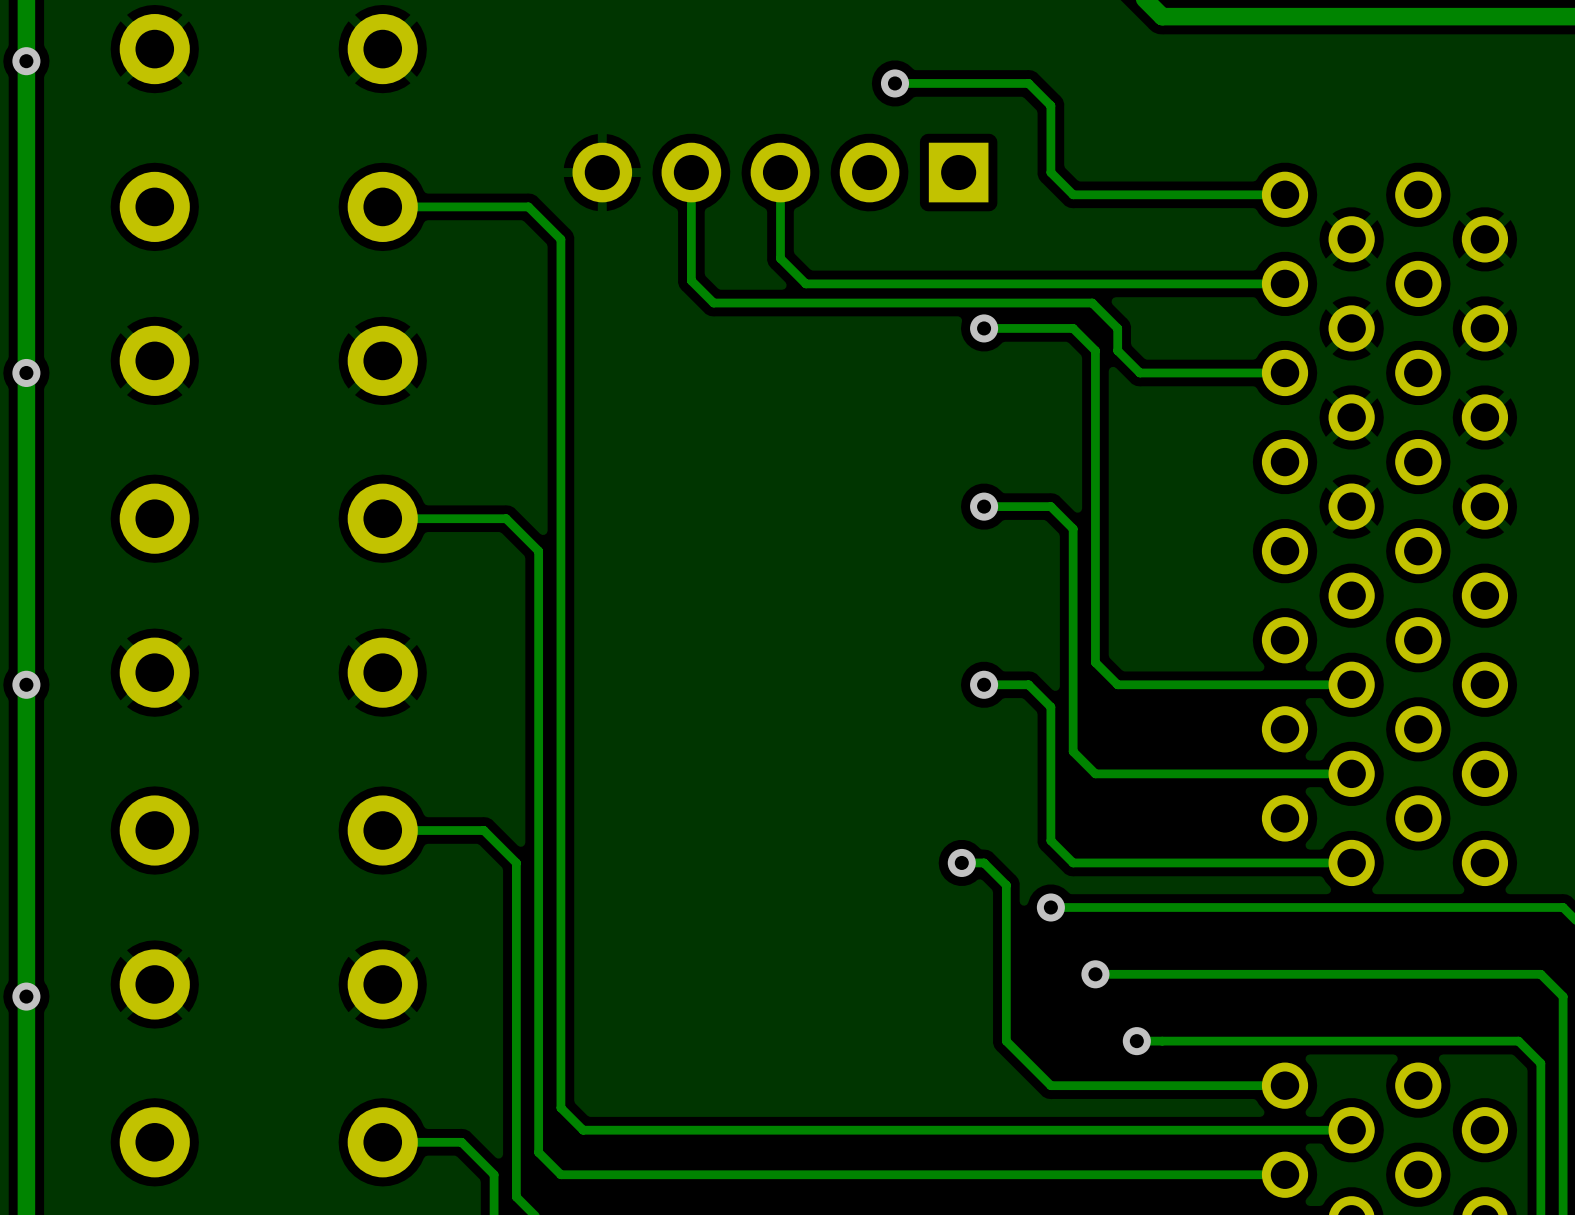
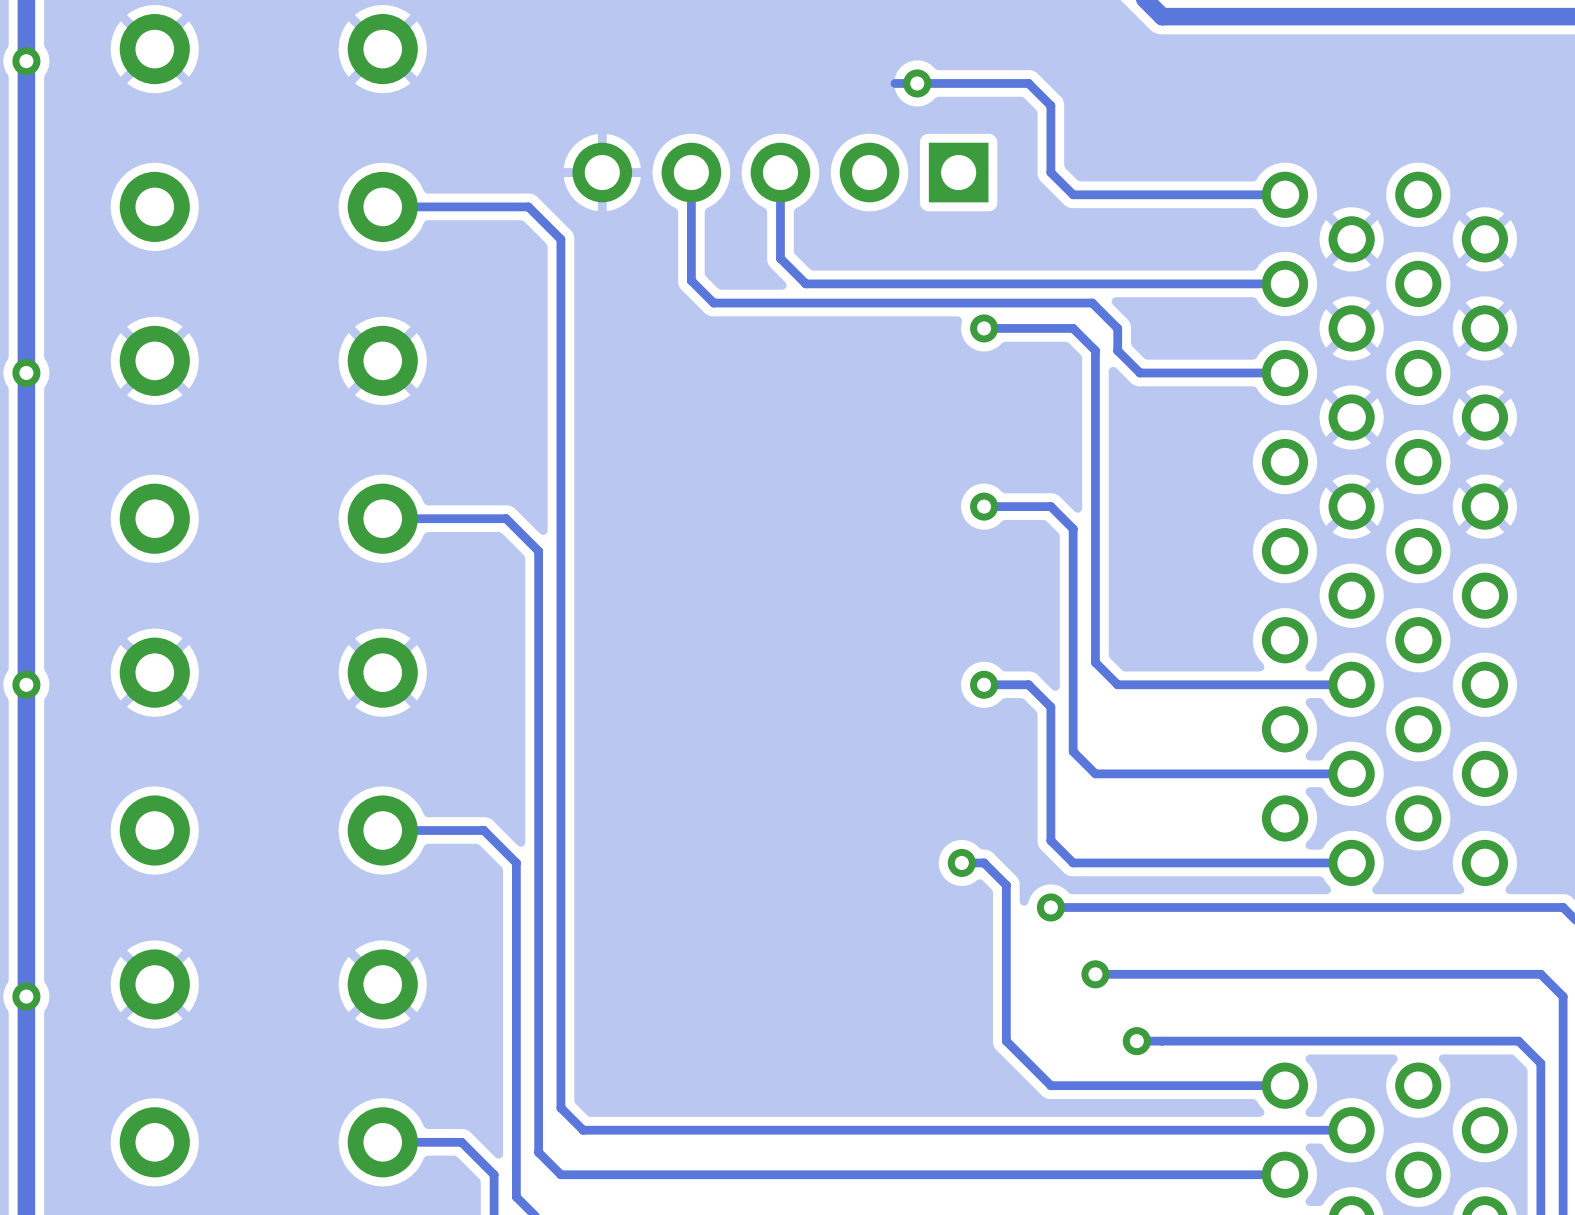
via position: (894, 83) -> (917, 83)

